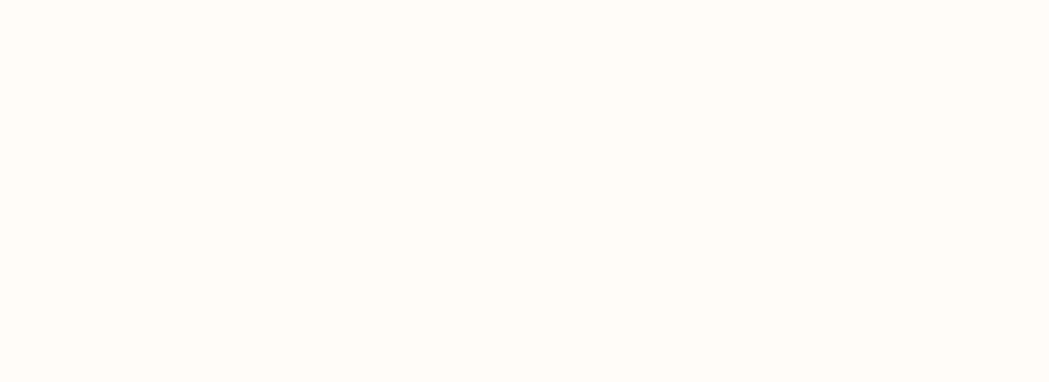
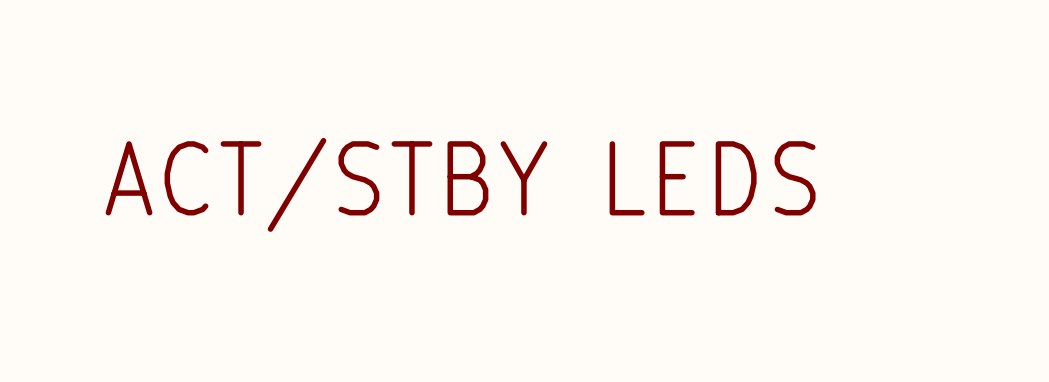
text: none -> ACT/STBY LEDS (460, 184)

